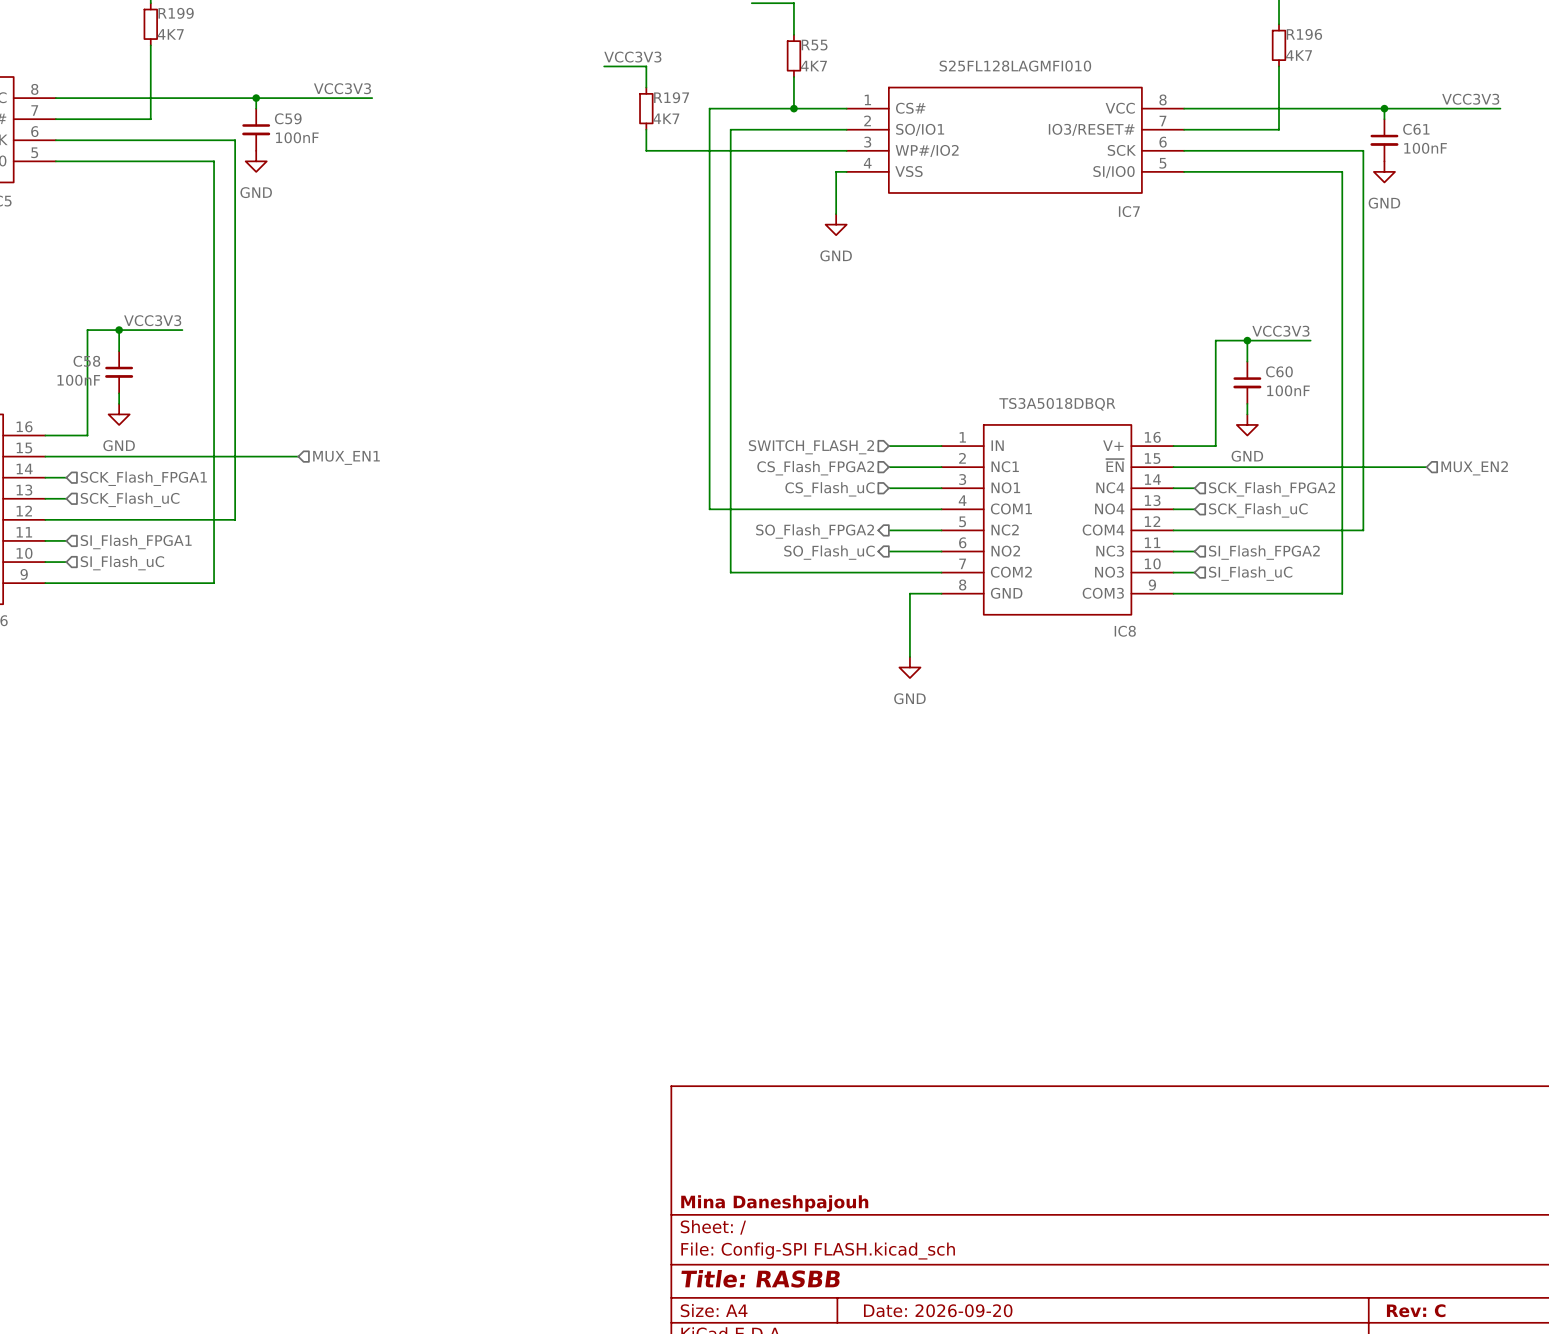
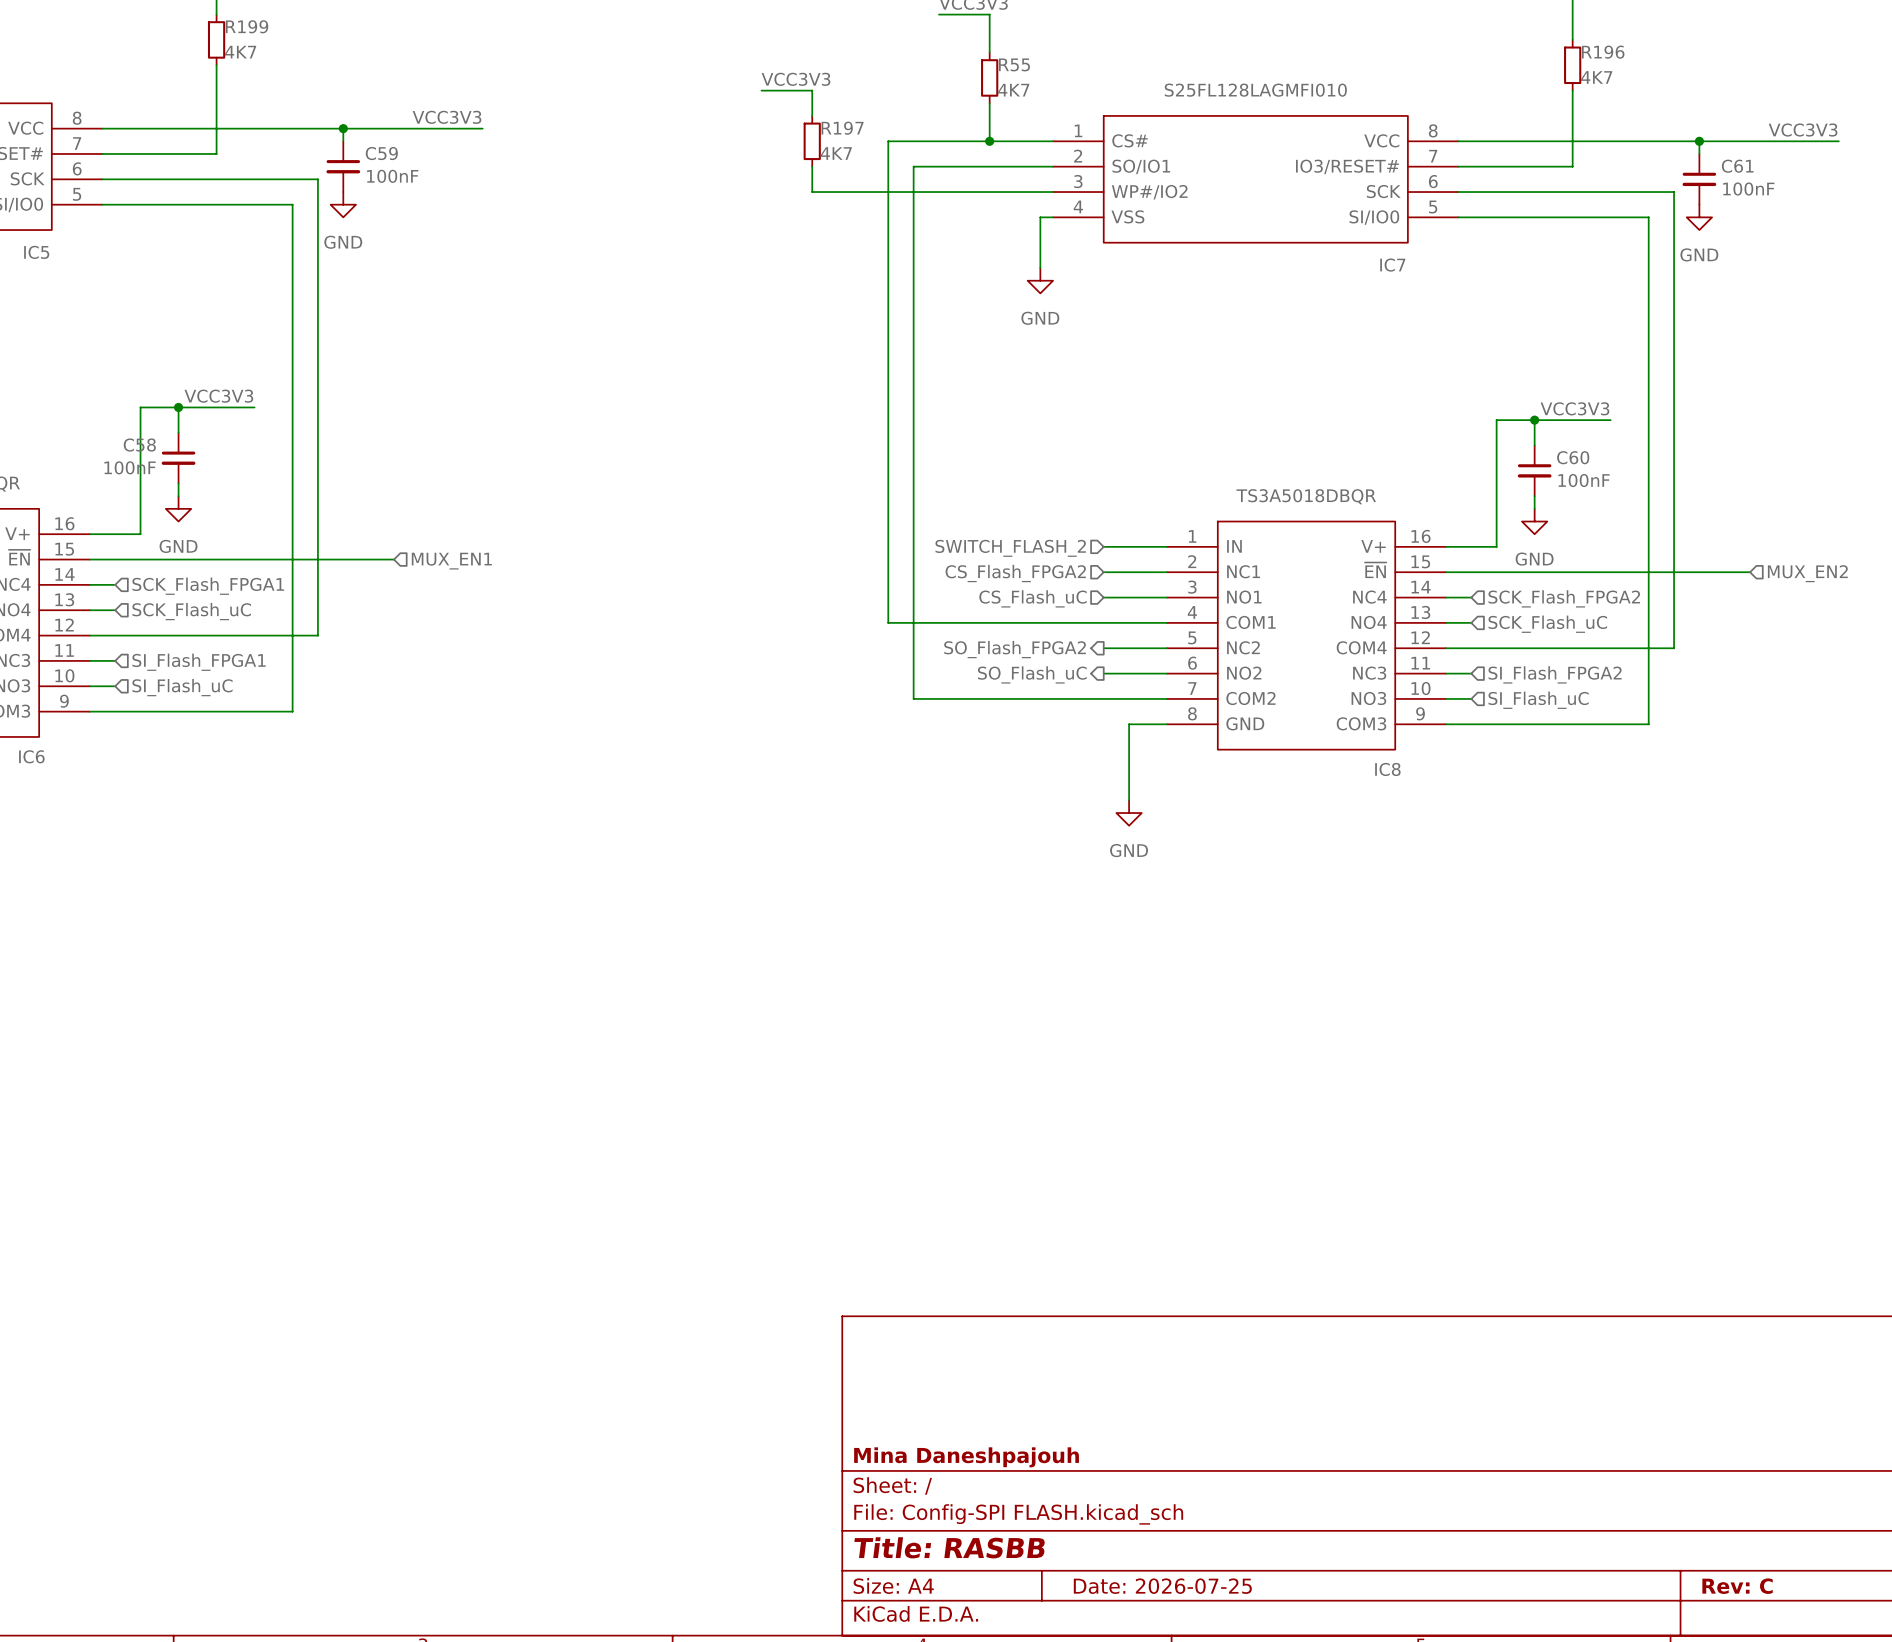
title block: Date: 2026-09-20 (938, 1310) -> Date: 2026-07-25 (1162, 1586)

